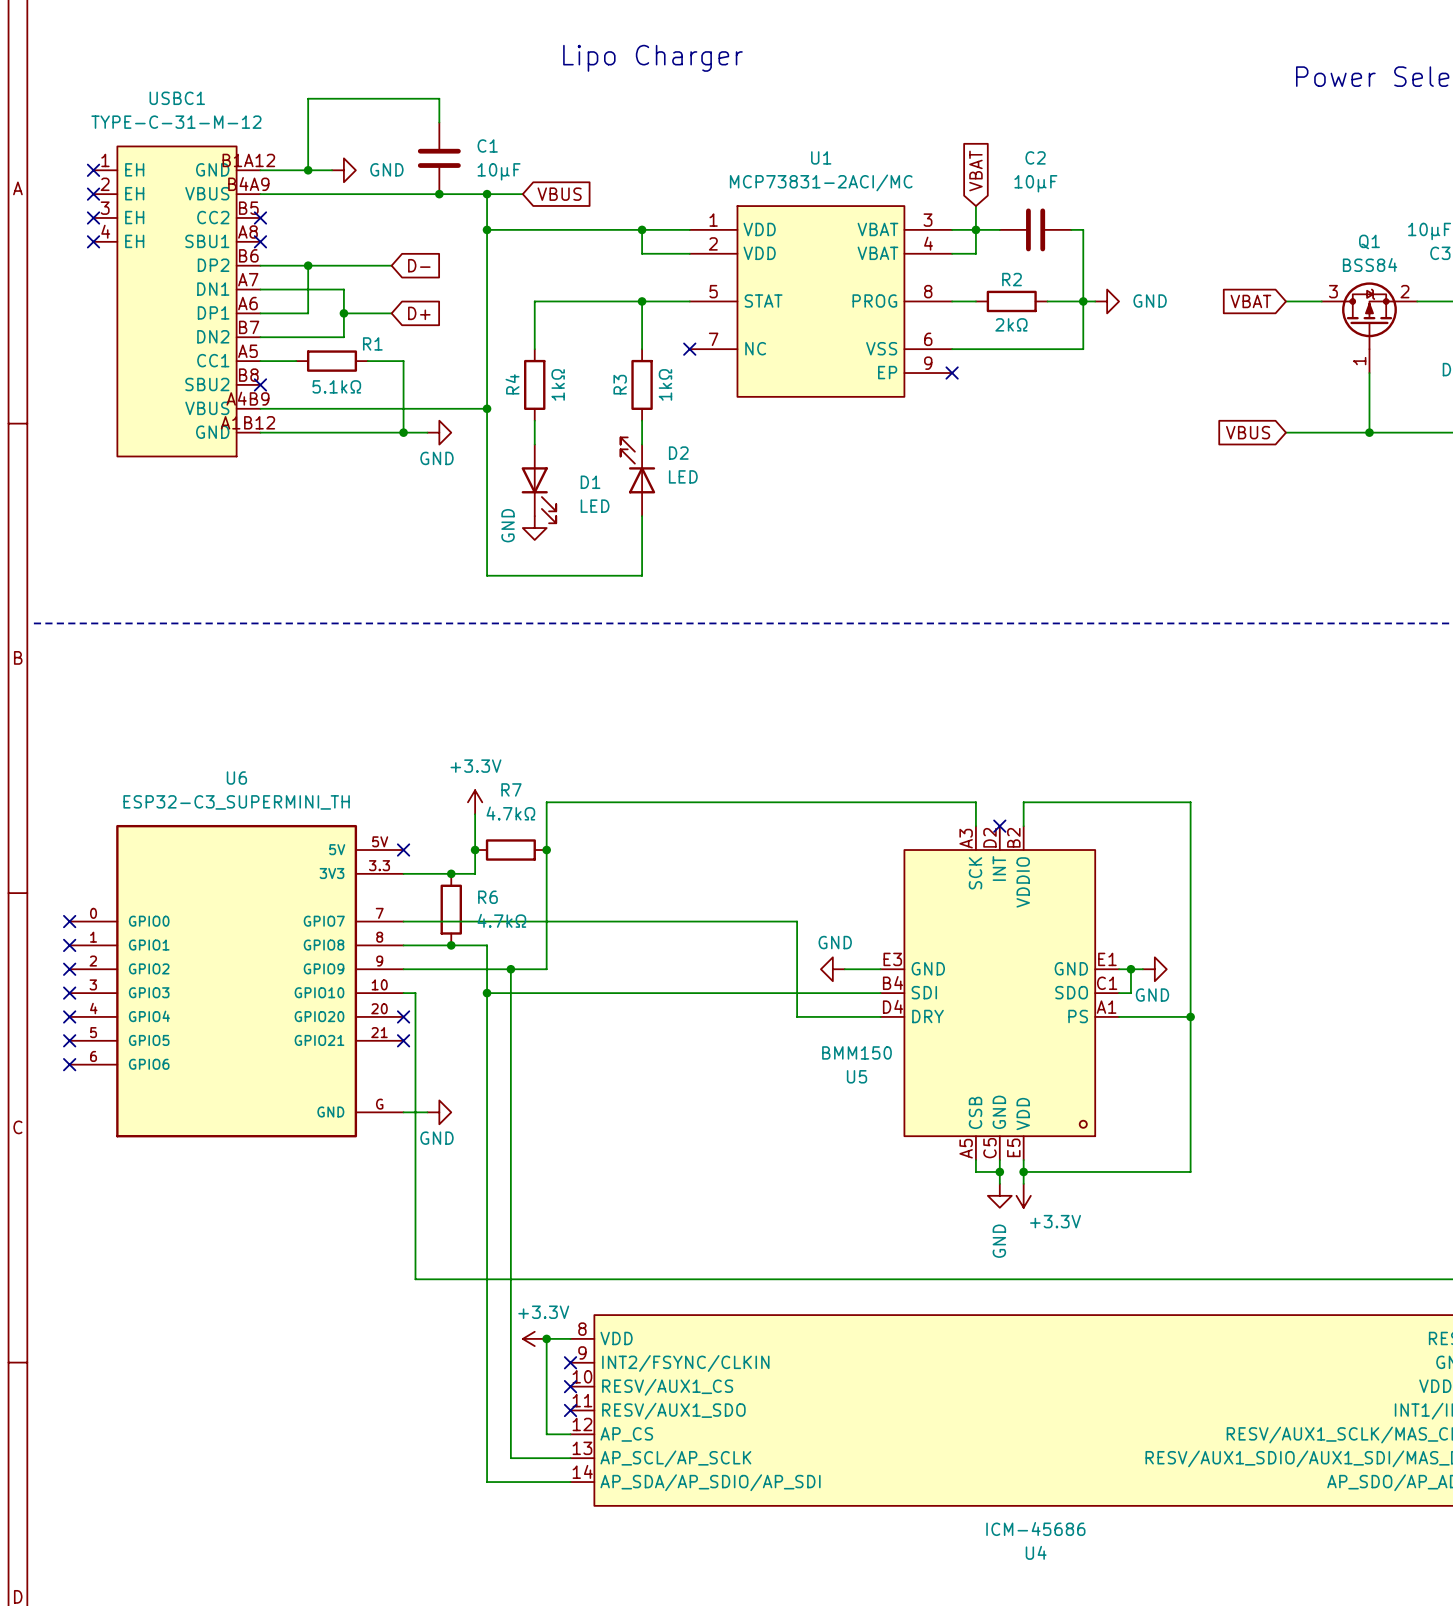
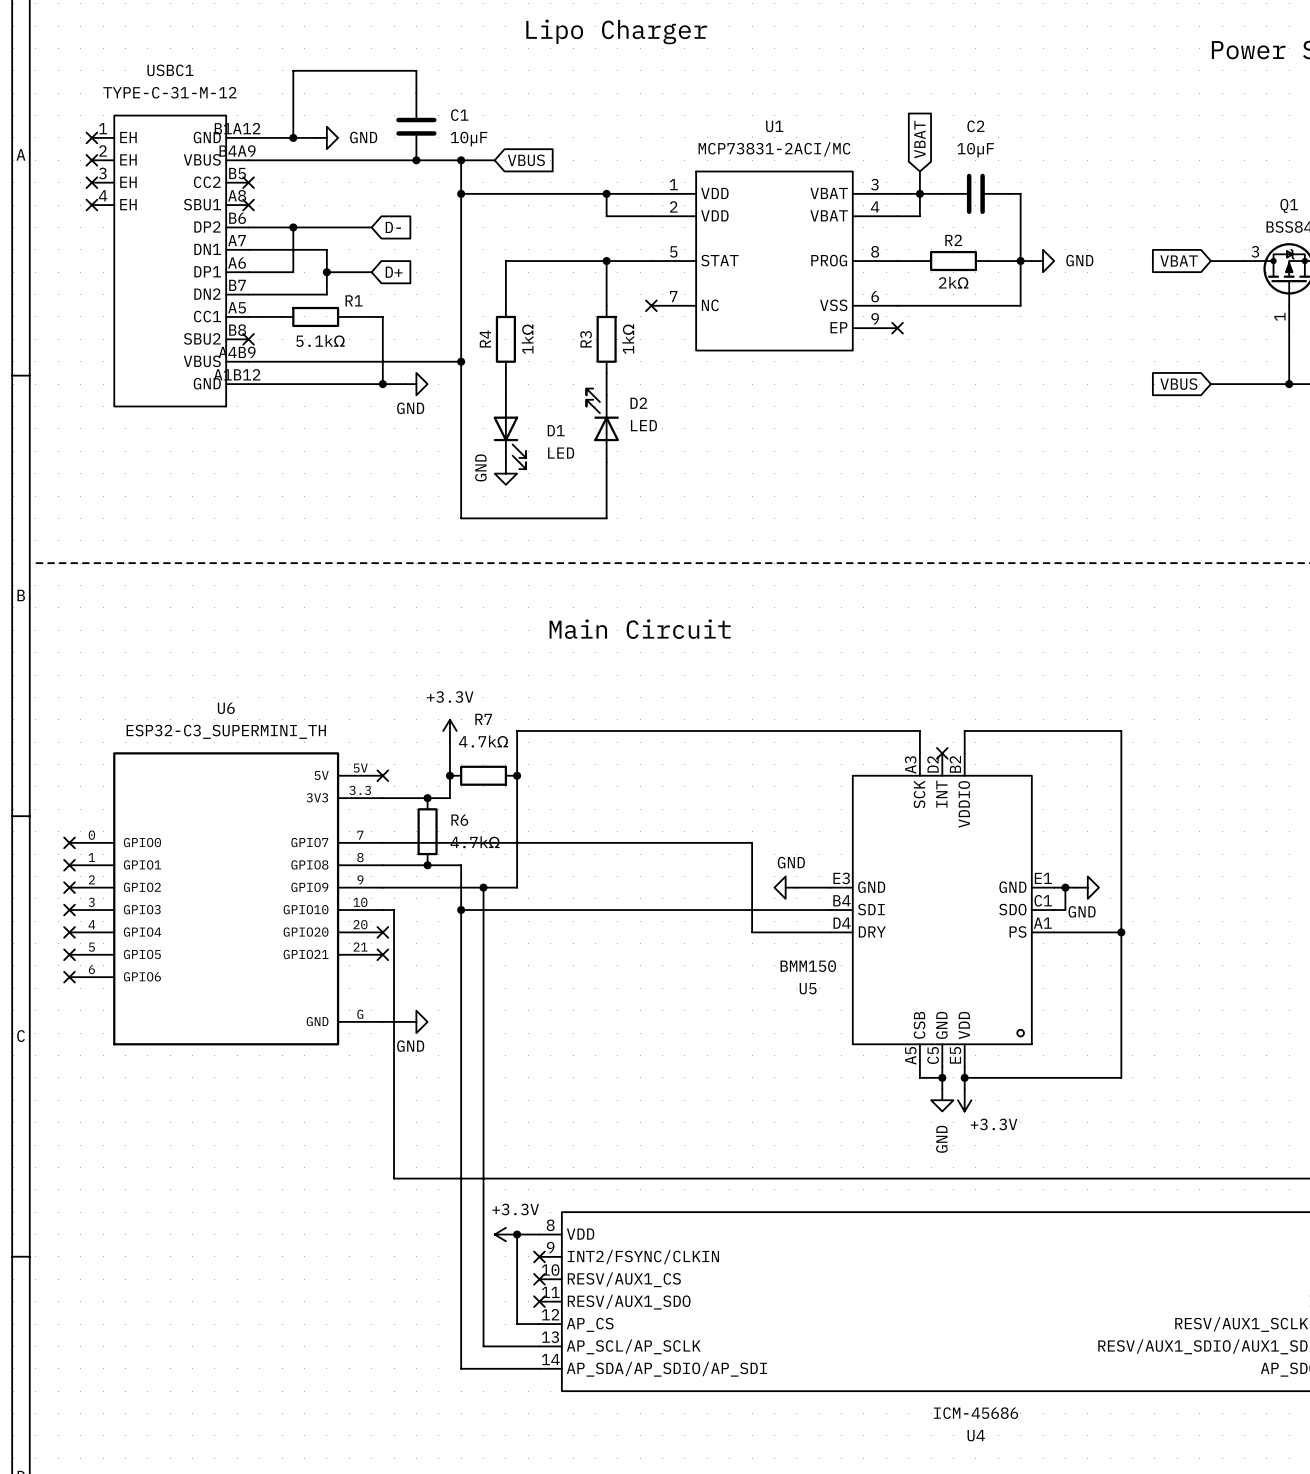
text: none -> Main Circuit (640, 629)

